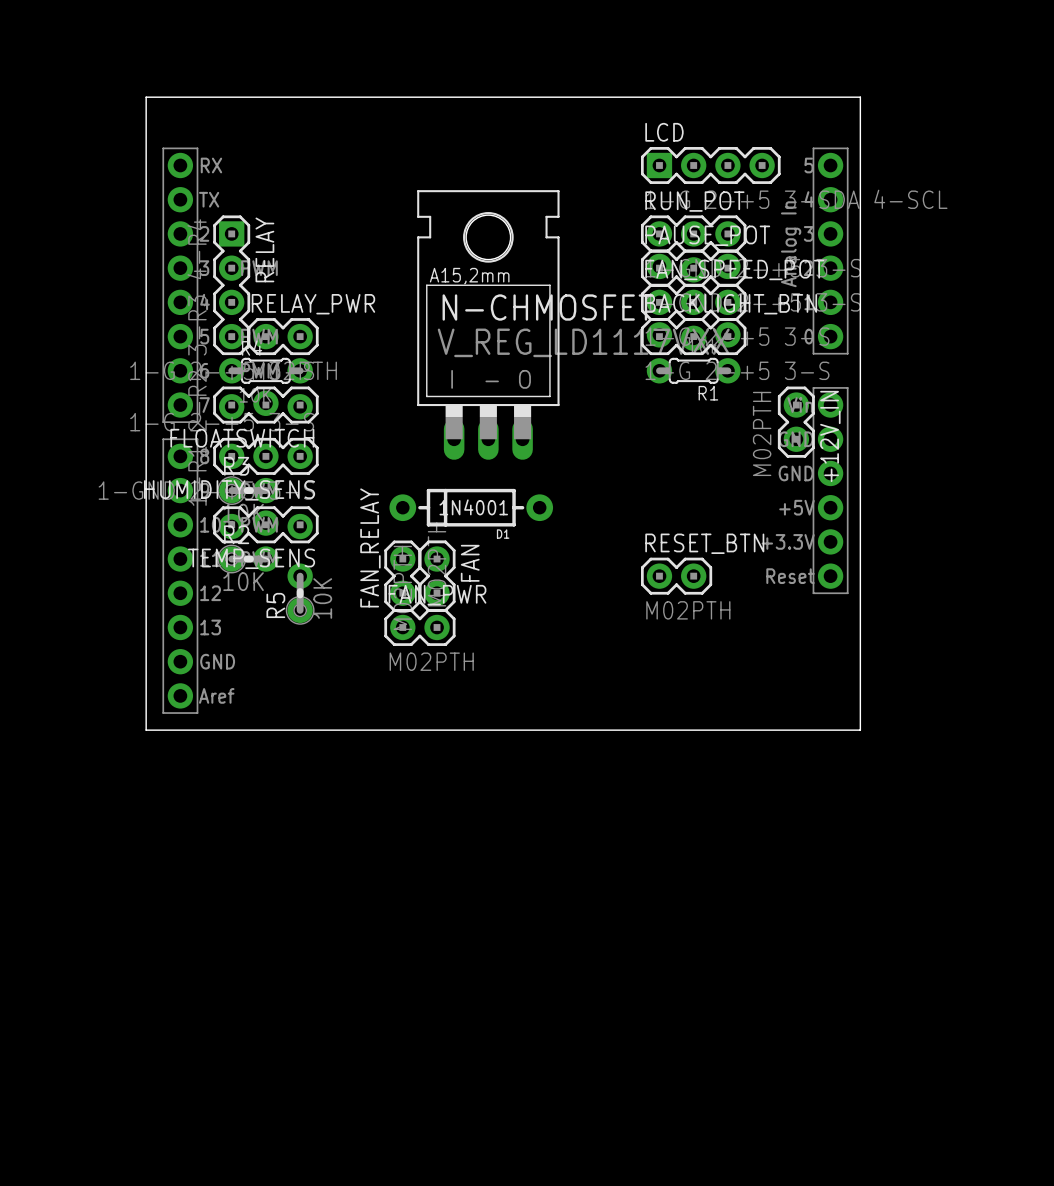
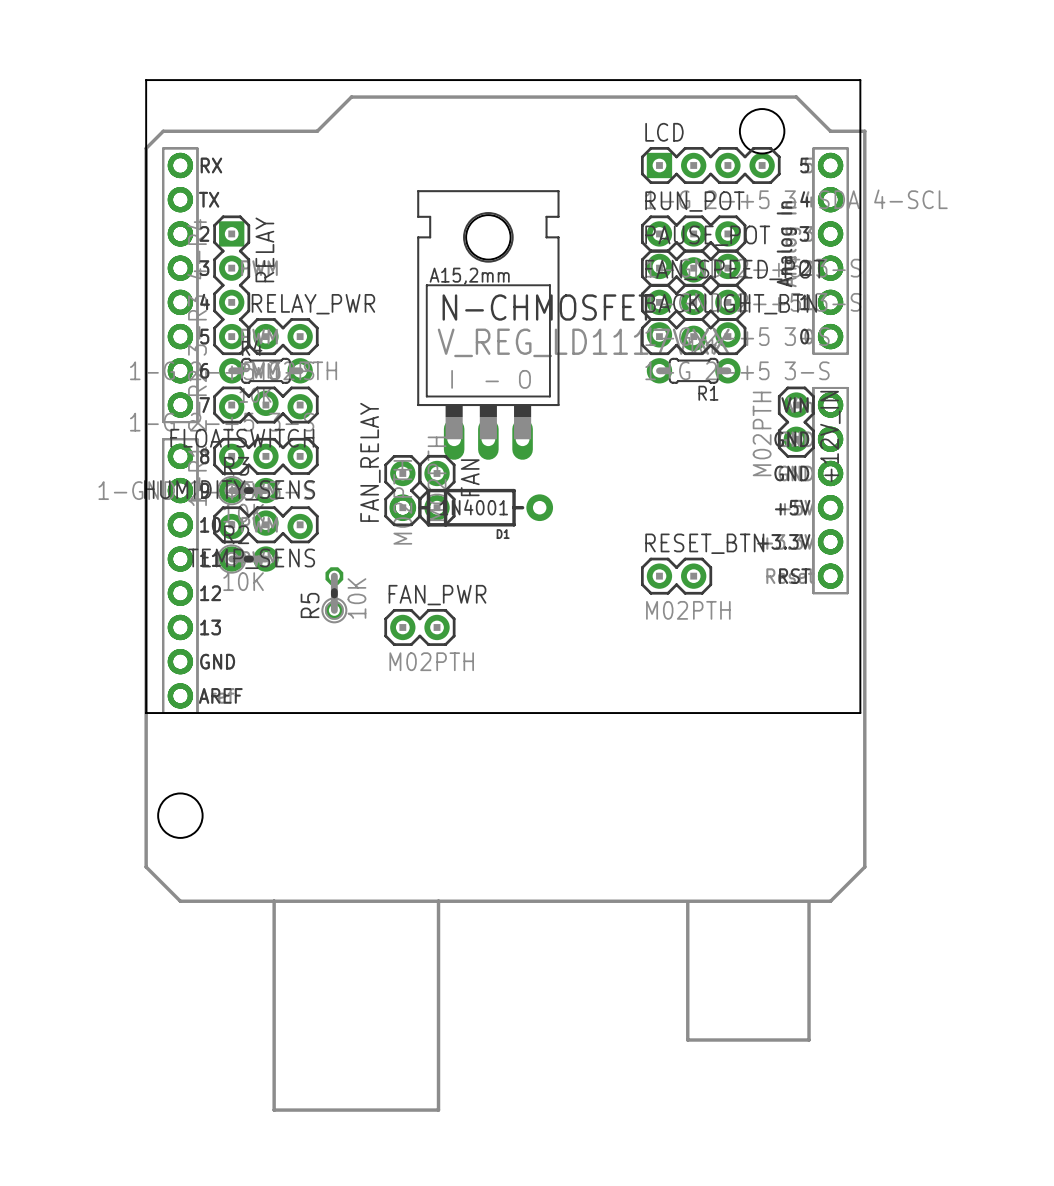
board edge: (146, 97) (860, 97) -> (146, 97) (146, 80) (860, 80) (860, 97)
R5 footprint: [286, 563, 315, 625] -> [321, 567, 348, 624]
FAN_RELAY position: (402, 576) -> (402, 490)
FAN position: (437, 576) -> (437, 490)
part: none -> (505, 603)
board edge: (146, 713) (146, 730) (860, 730) (860, 713) -> (146, 713) (860, 713)

